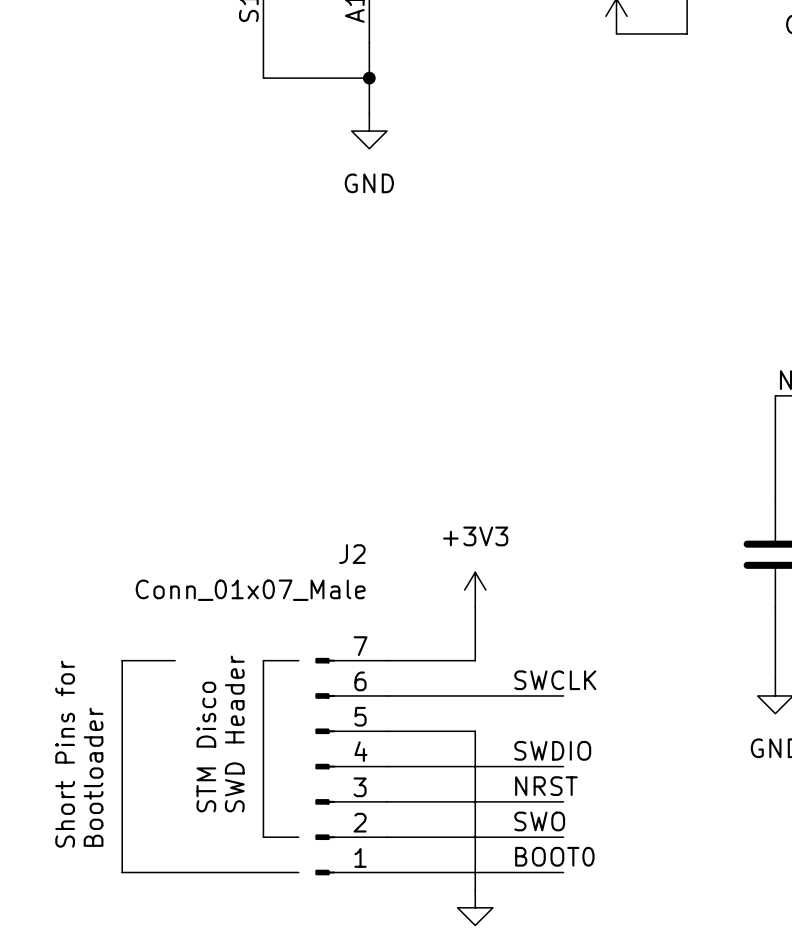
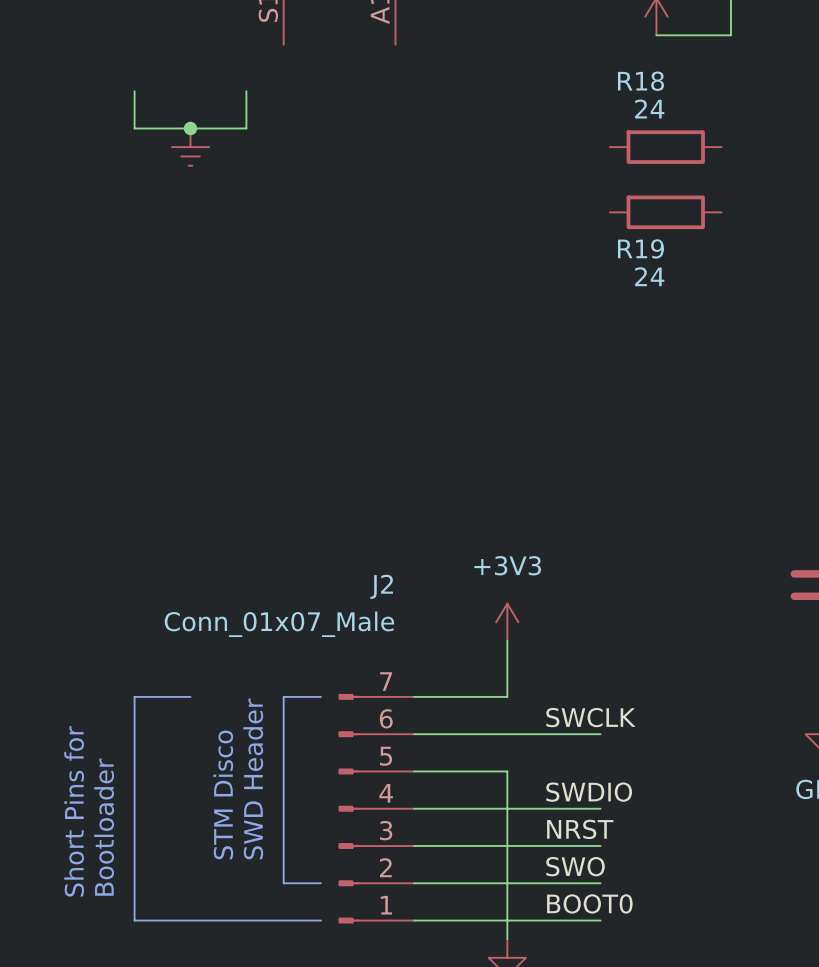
wire: (263, 42) (263, 78) (369, 78) -> none
wire: (369, 42) (369, 113) -> none
junction: (369, 78) -> none
wire: none -> (134, 91) (134, 128) (246, 128) (246, 91)
junction: none -> (190, 128)
power symbol: GND (369, 131) -> none
power symbol: none -> (190, 147)
R18: none -> 24 (665, 147)
R19: none -> 24 (665, 212)

